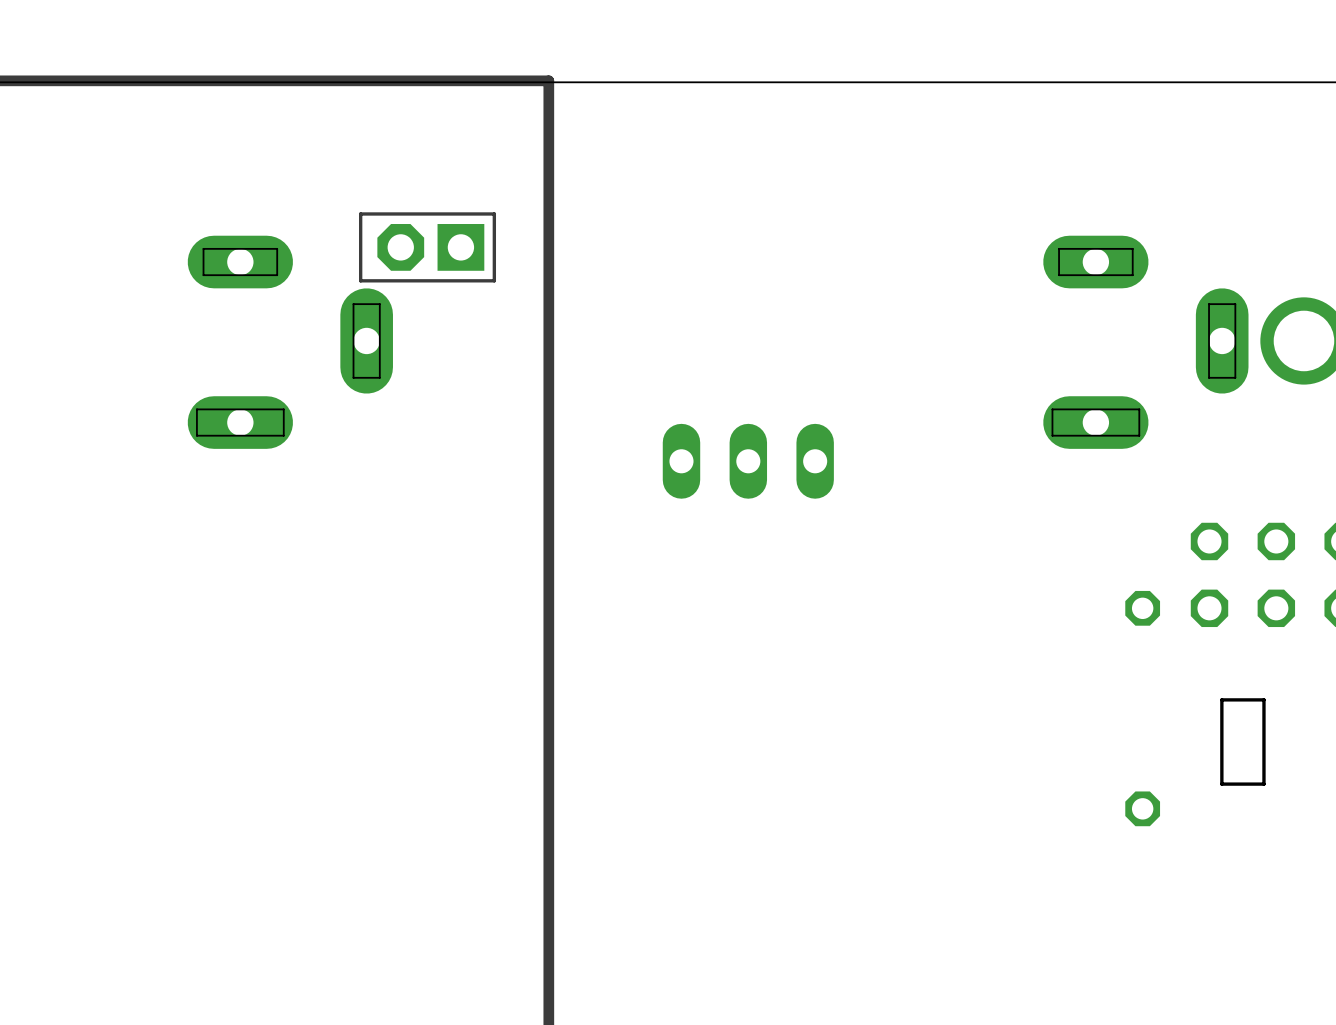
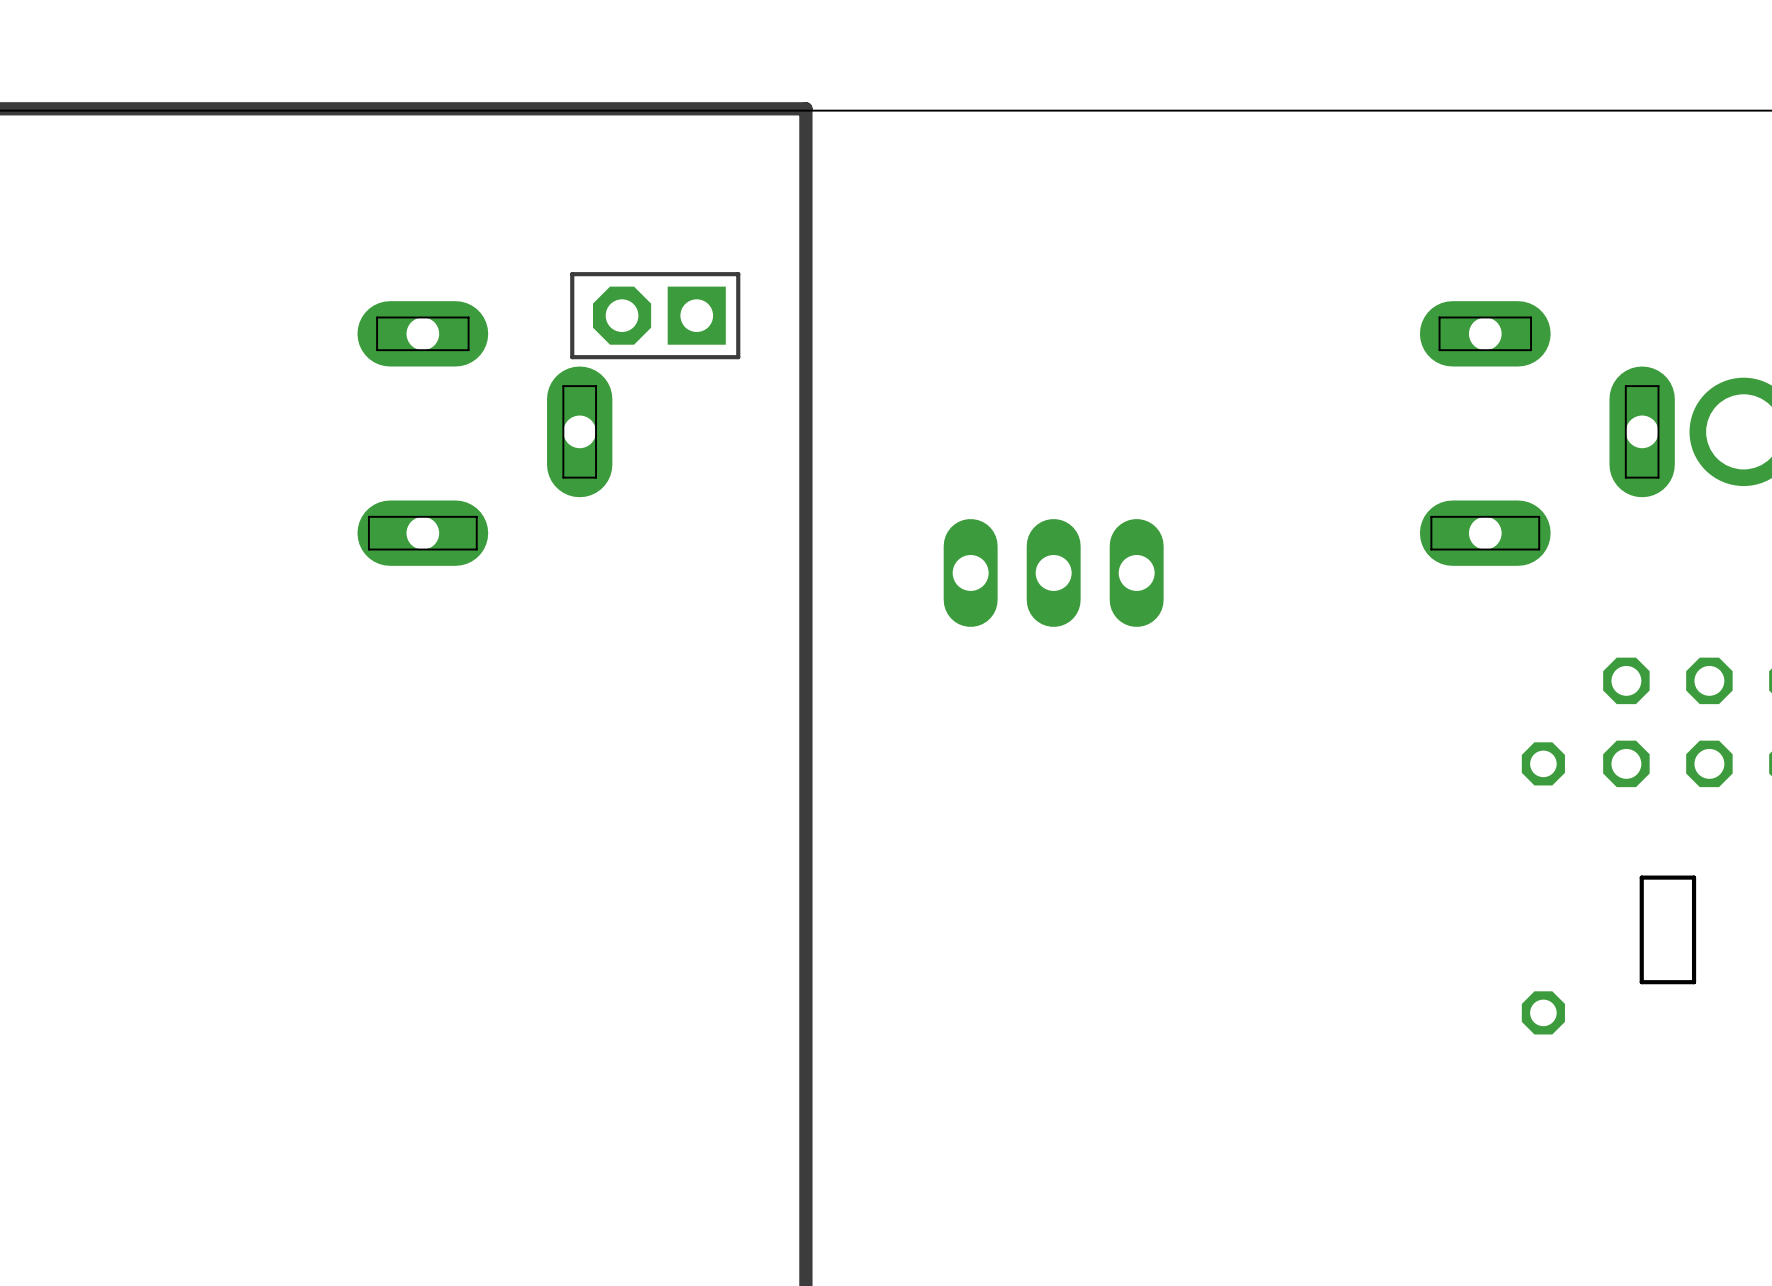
part footprint: [662, 423, 834, 499] -> [943, 519, 1164, 627]

